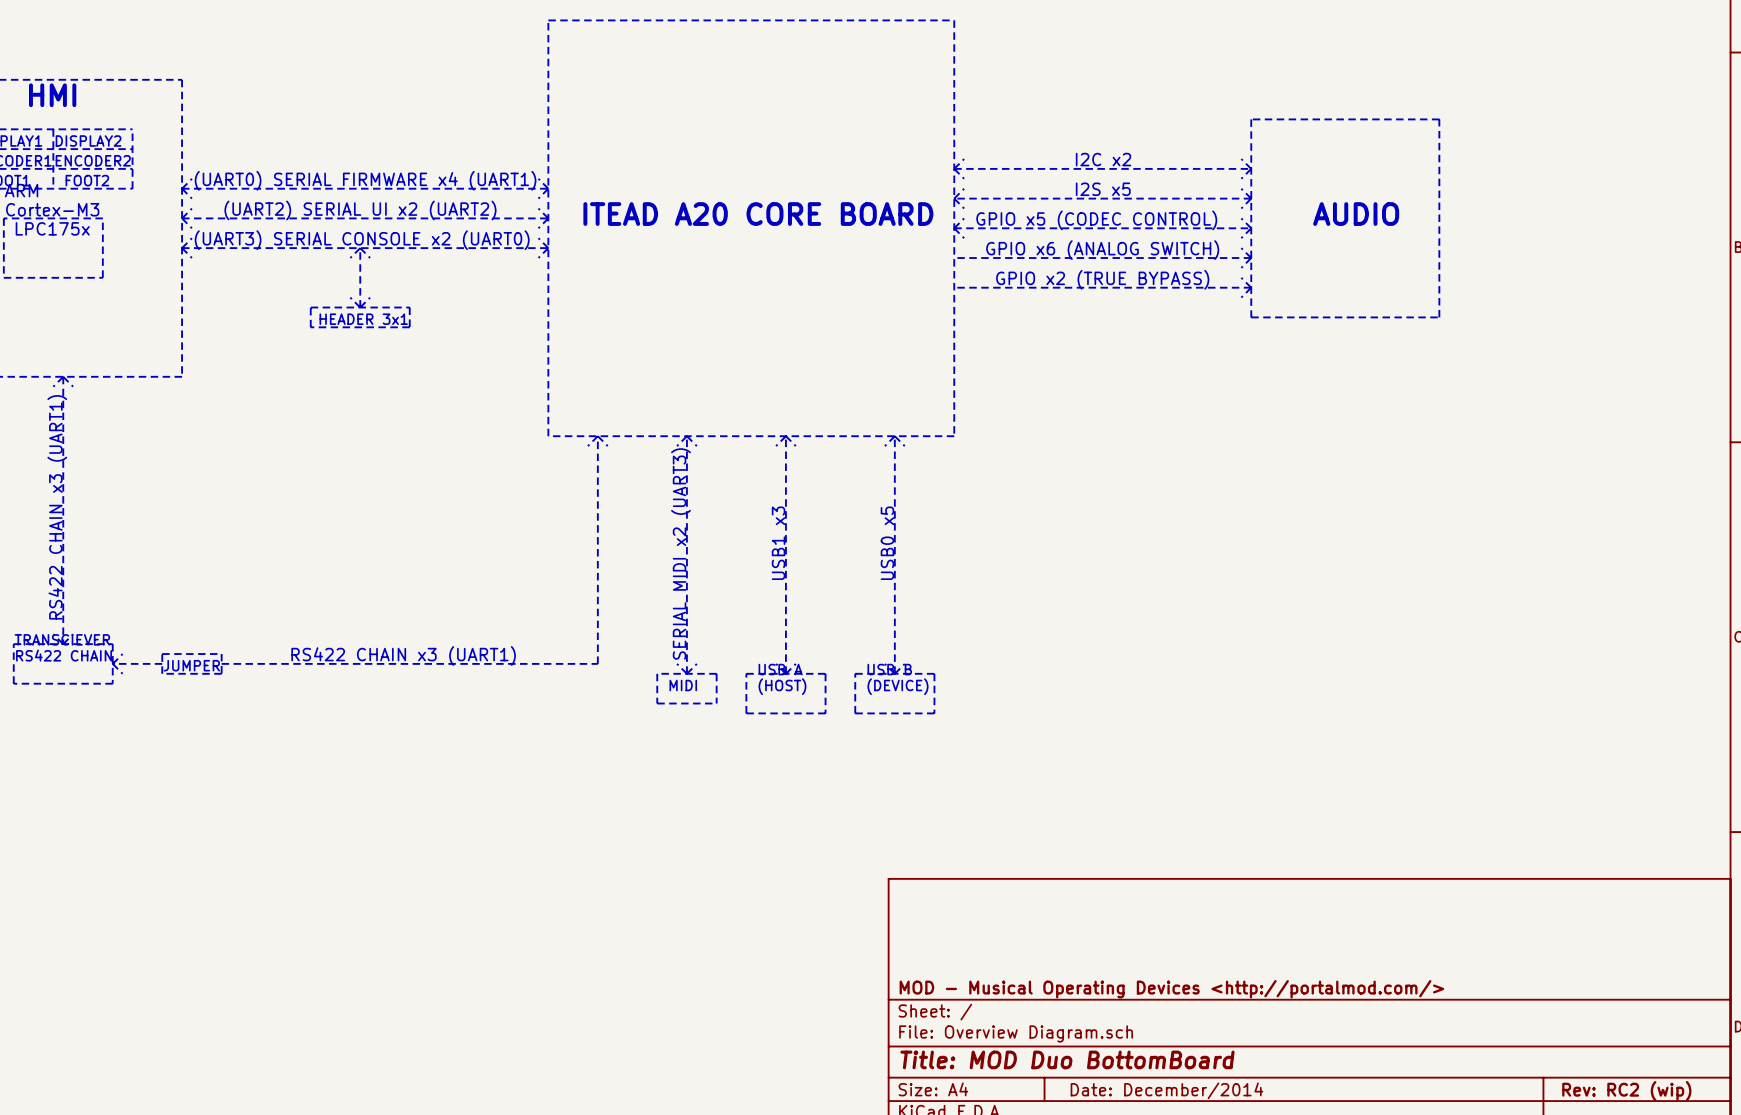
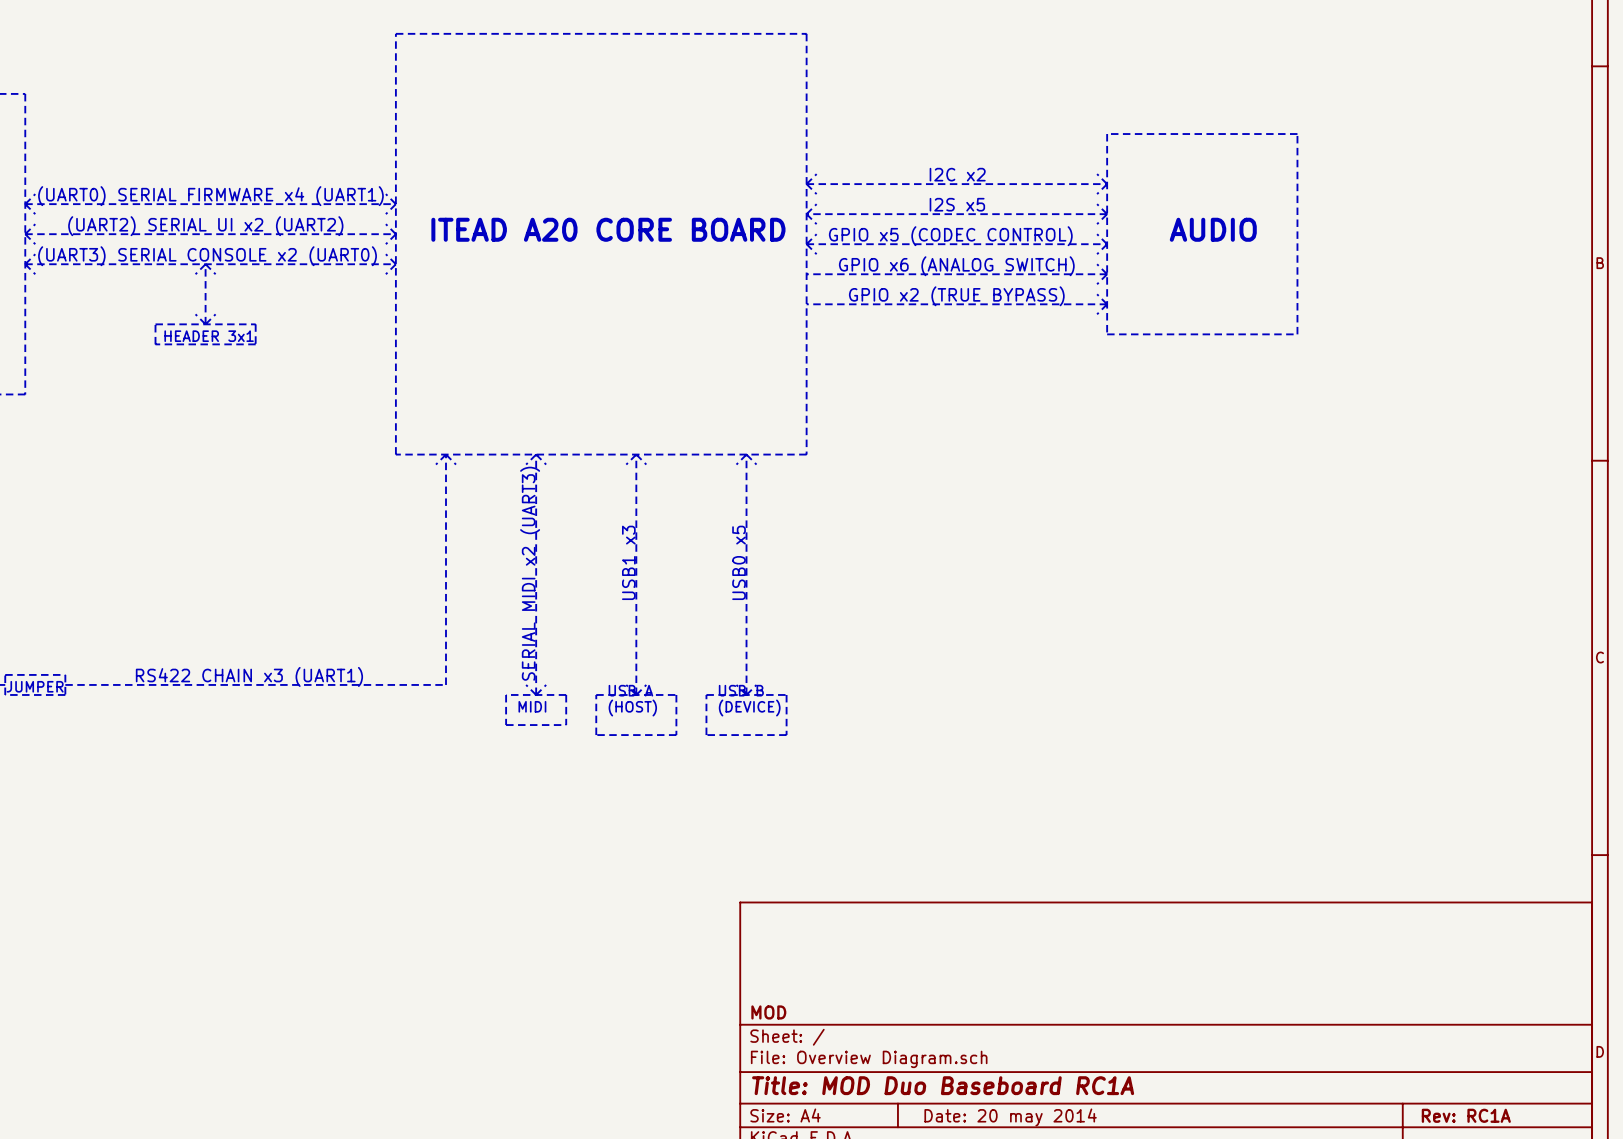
title block: MOD - Musical Operating Devices <http://portalmod.com/> (1171, 989) -> MOD (768, 1012)
title block: Title: MOD Duo BottomBoard (1067, 1059) -> Title: MOD Duo Baseboard RC1A (943, 1085)
title block: Date: December/2014 (1166, 1090) -> Date: 20 may 2014 (1010, 1117)
title block: Rev: RC2 (wip) (1626, 1091) -> Rev: RC1A (1466, 1115)

